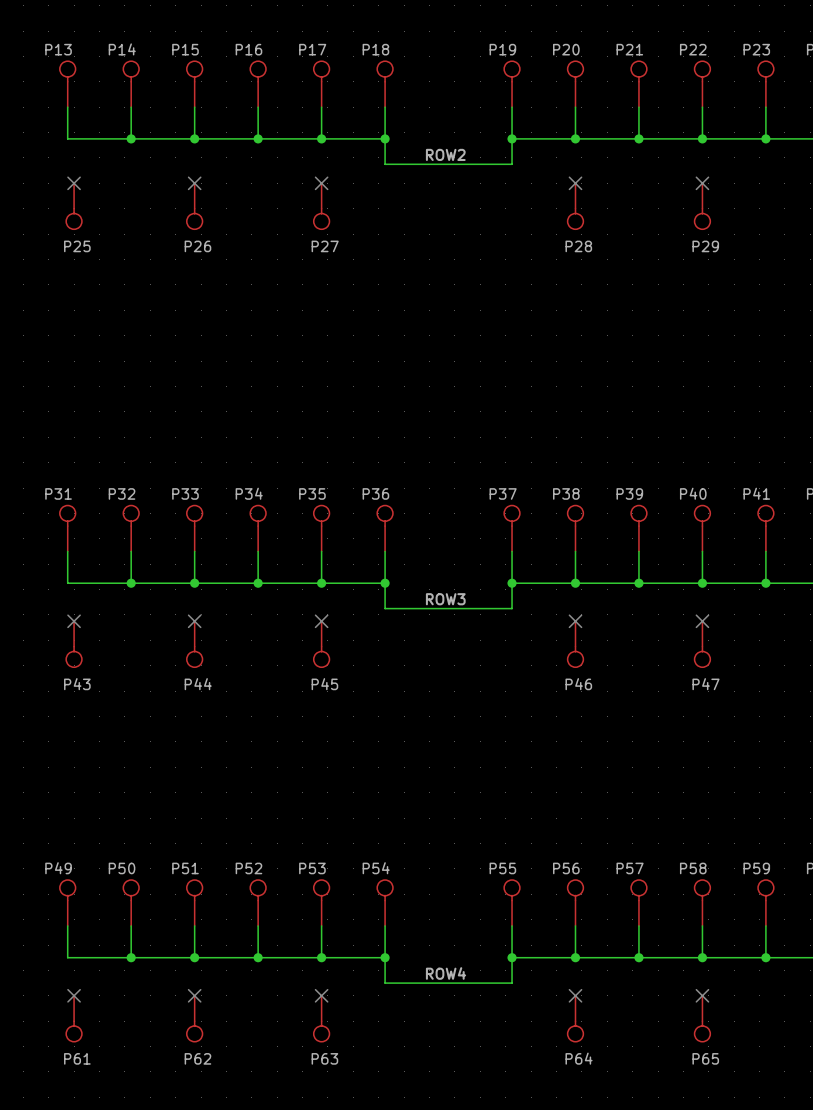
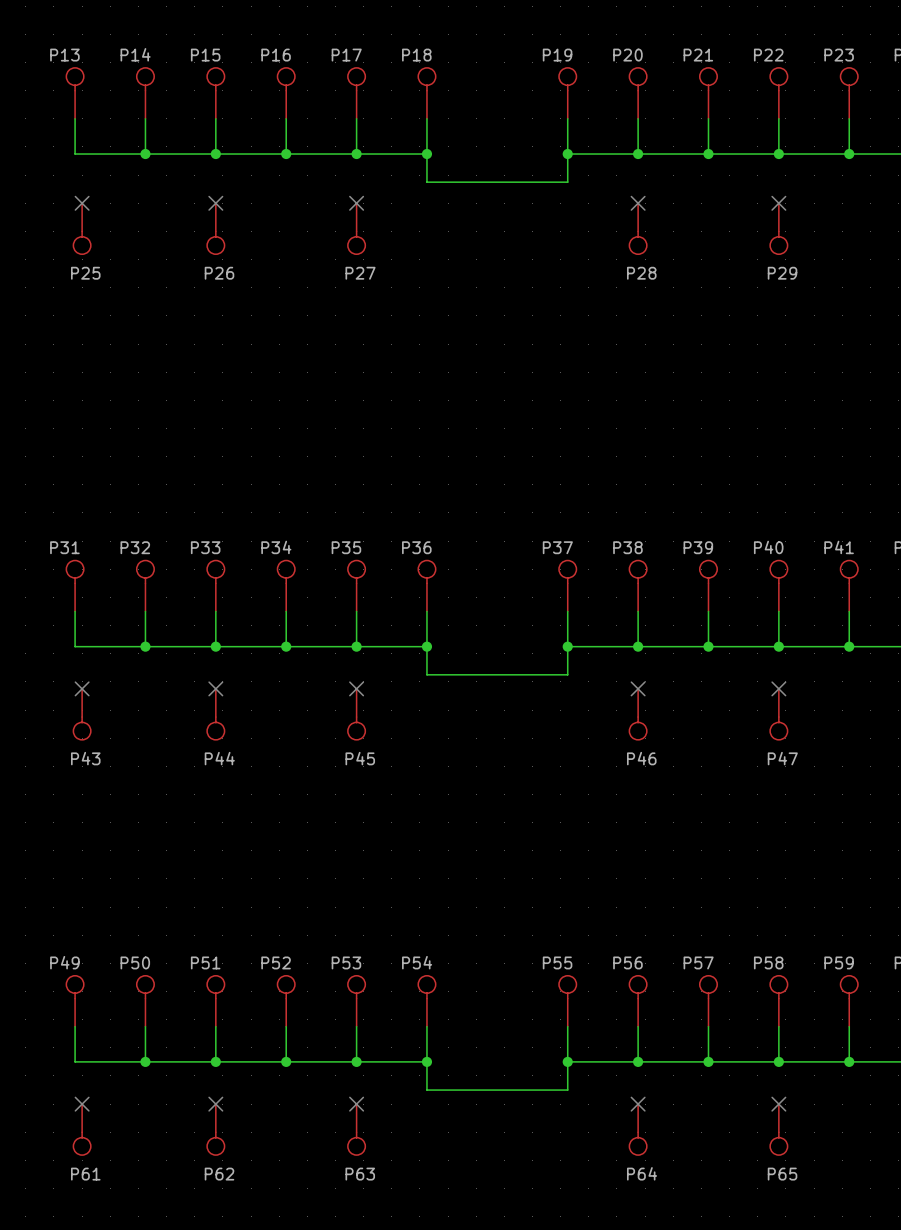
label: ROW2 (445, 154) -> none
label: ROW3 (445, 599) -> none
label: ROW4 (446, 973) -> none

